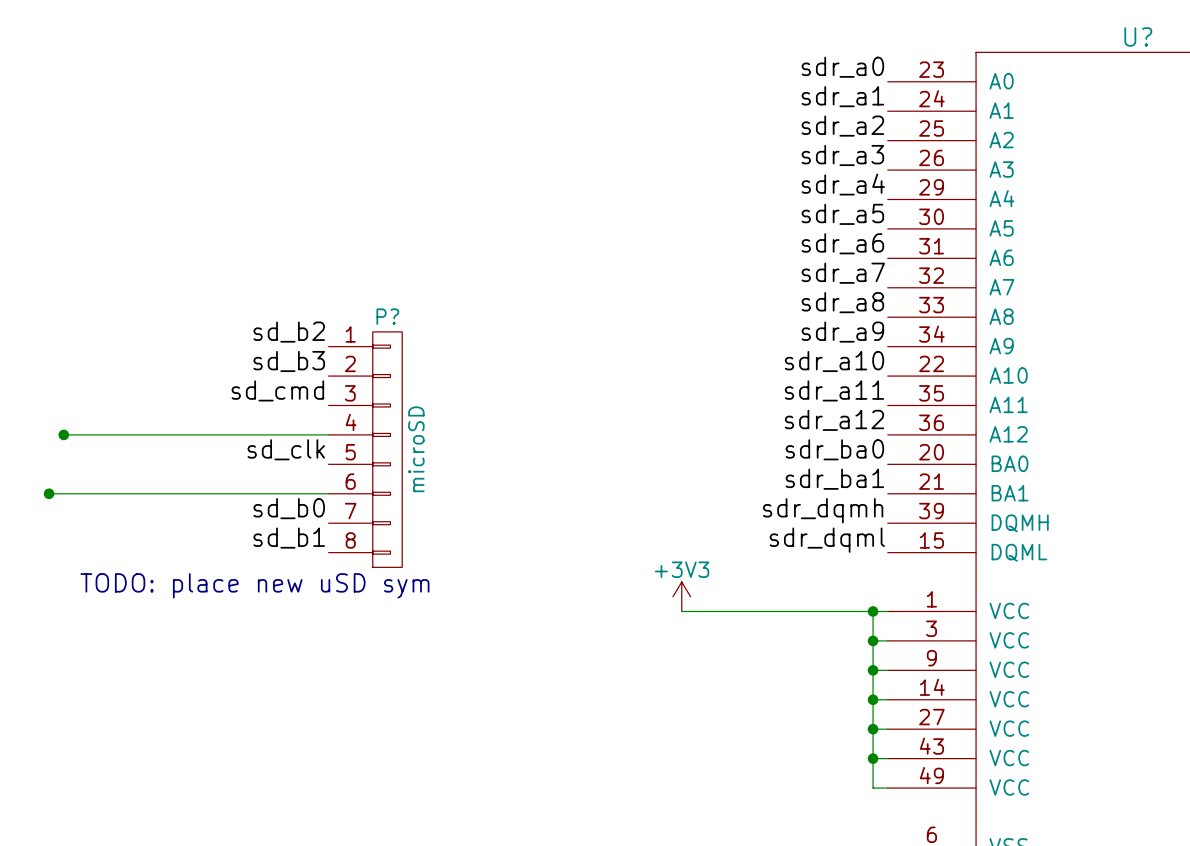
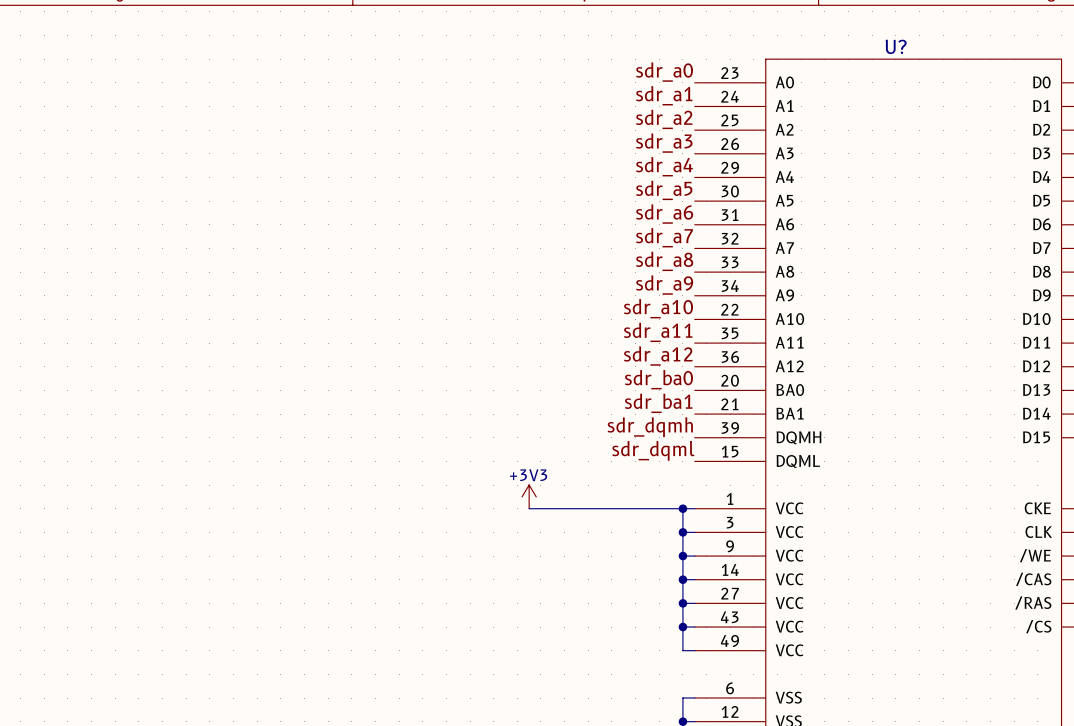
label: sd_b2 (289, 332) -> none
label: sd_b3 (289, 361) -> none
label: sd_cmd (277, 390) -> none
wire: (63, 434) (328, 434) -> none
junction: (63, 434) -> none
label: sd_clk (286, 449) -> none
P?: microSD (365, 449) -> none
wire: (49, 493) (328, 493) -> none
junction: (49, 493) -> none
label: sd_b0 (289, 508) -> none
label: sd_b1 (289, 538) -> none
text: TODO: place new uSD sym (254, 585) -> none

